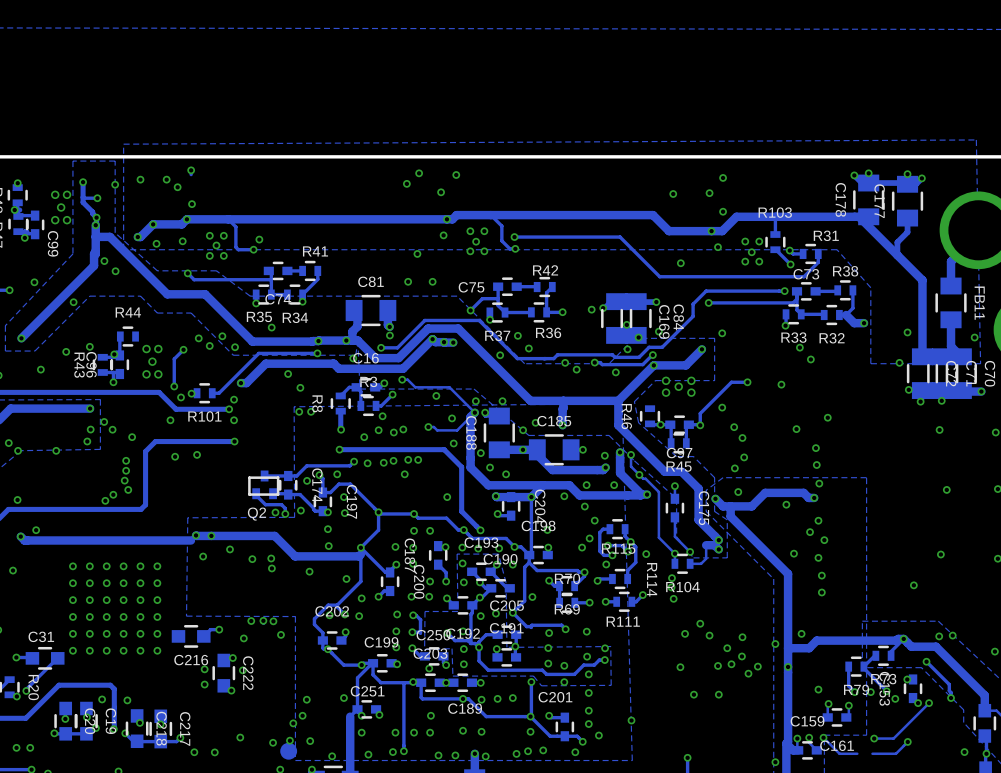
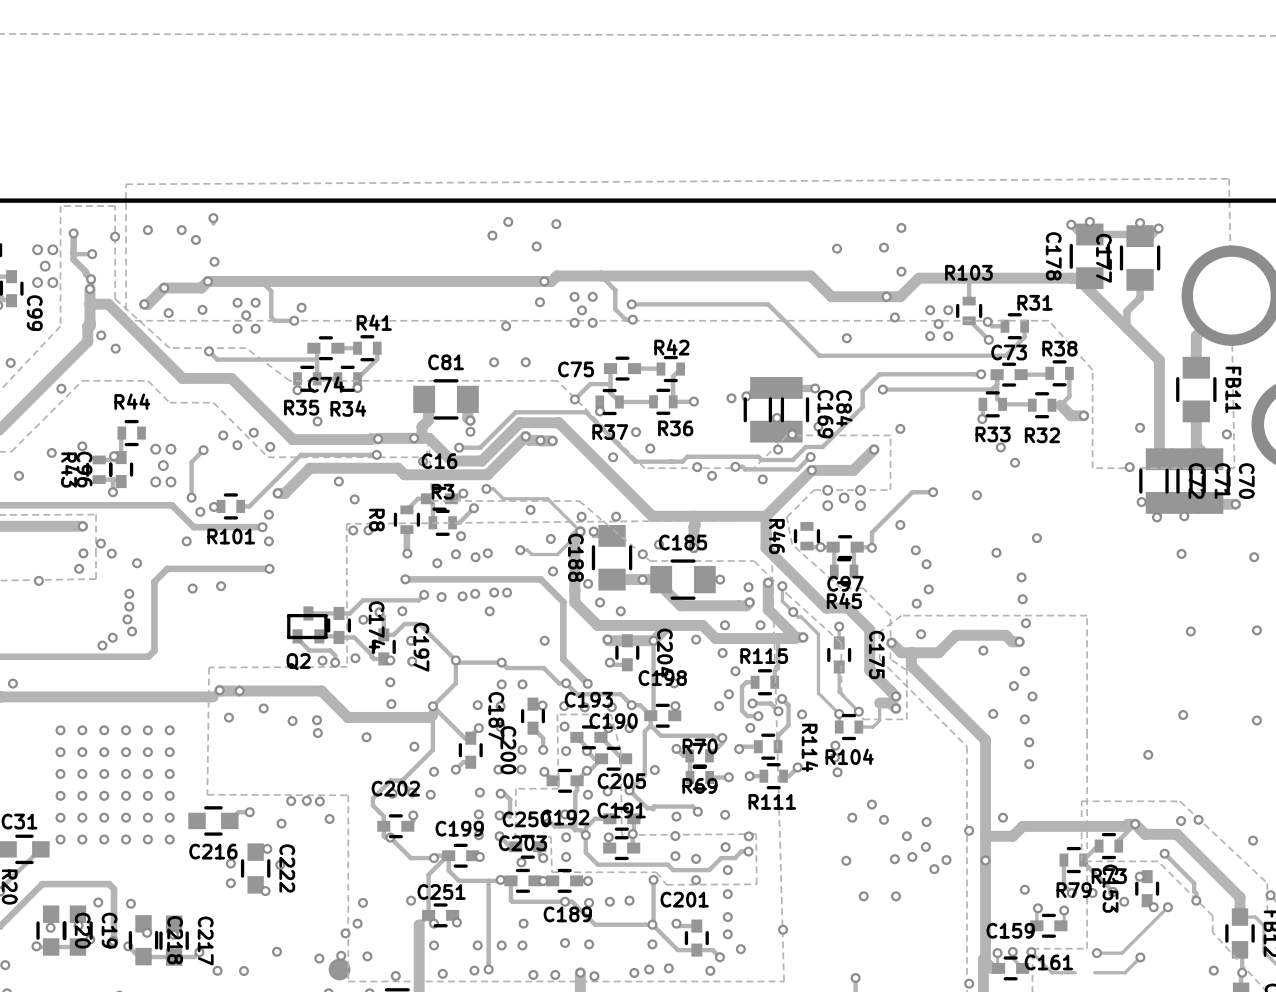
track: (625, 529) (625, 536) (630, 542) -> (774, 682) (774, 671) (778, 668) (778, 638)
R115 name position: R115 (618, 548) -> R115 (764, 656)

